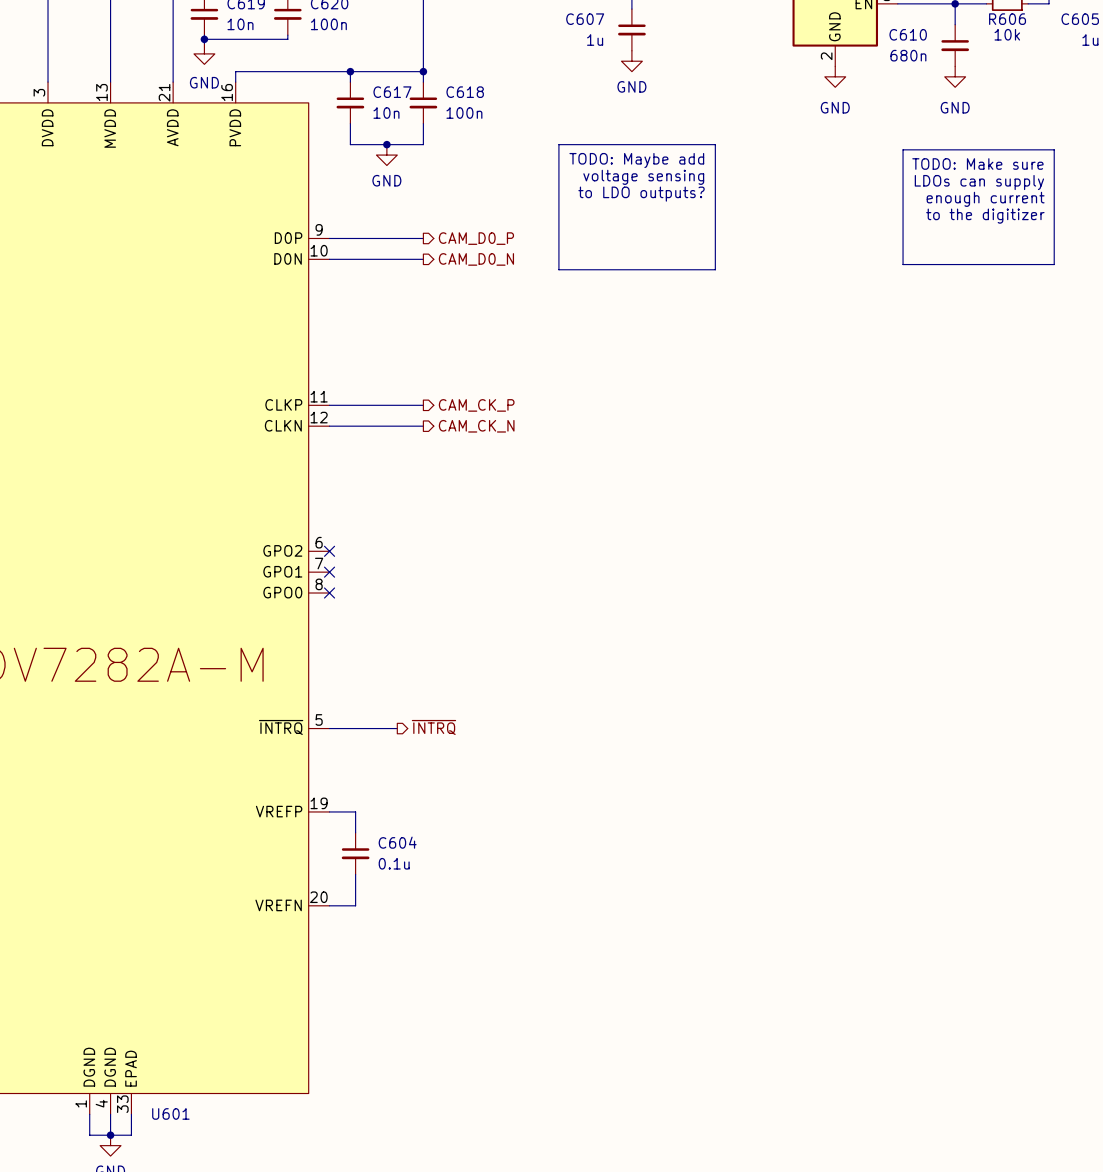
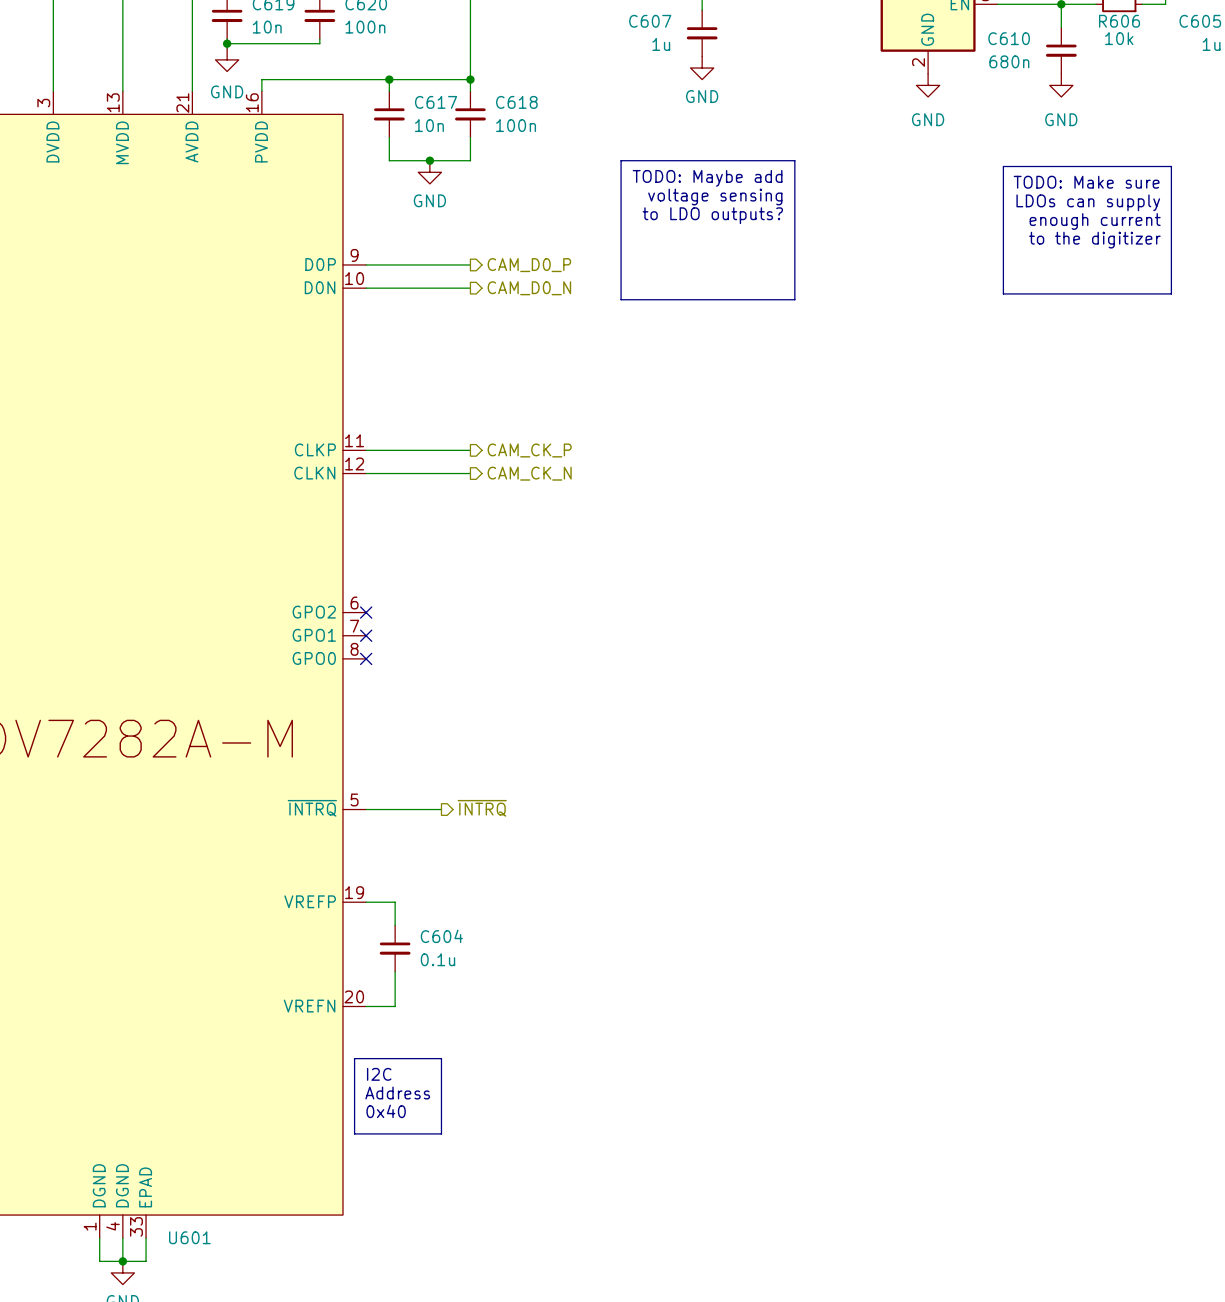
line: none -> (354, 1058) (441, 1058) (441, 1133) (354, 1133) (354, 1058)
text: none -> I2C (379, 1074)
text: none -> Address (397, 1093)
text: none -> 0x40 (386, 1111)

